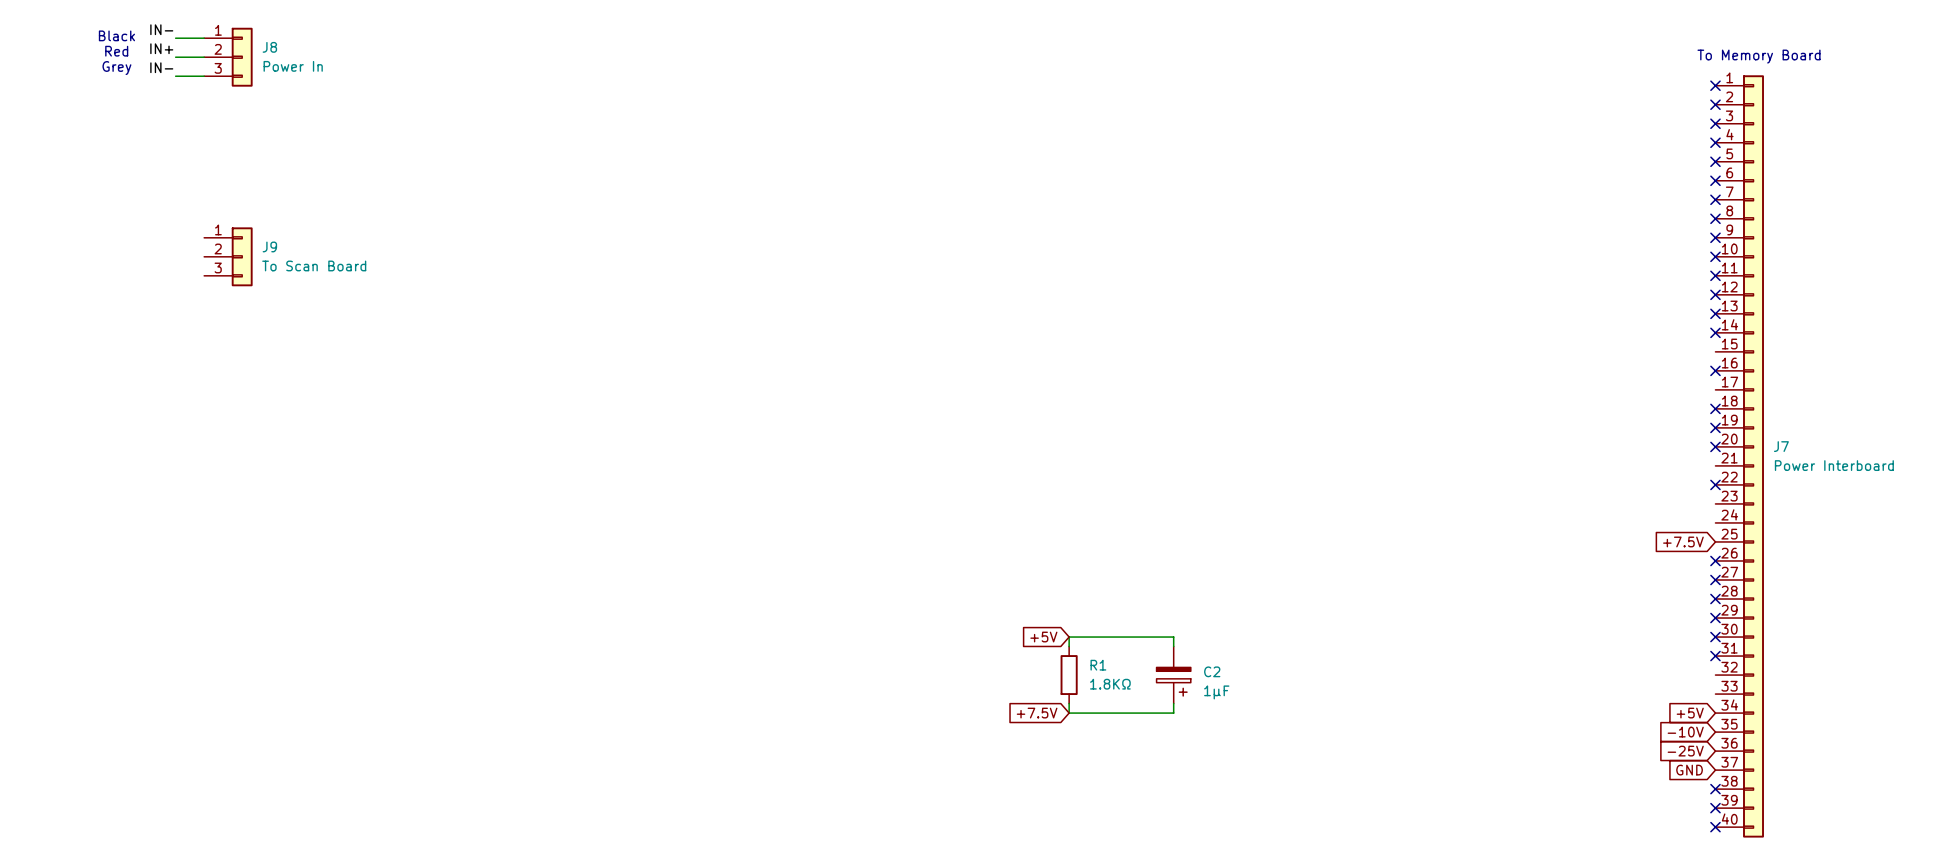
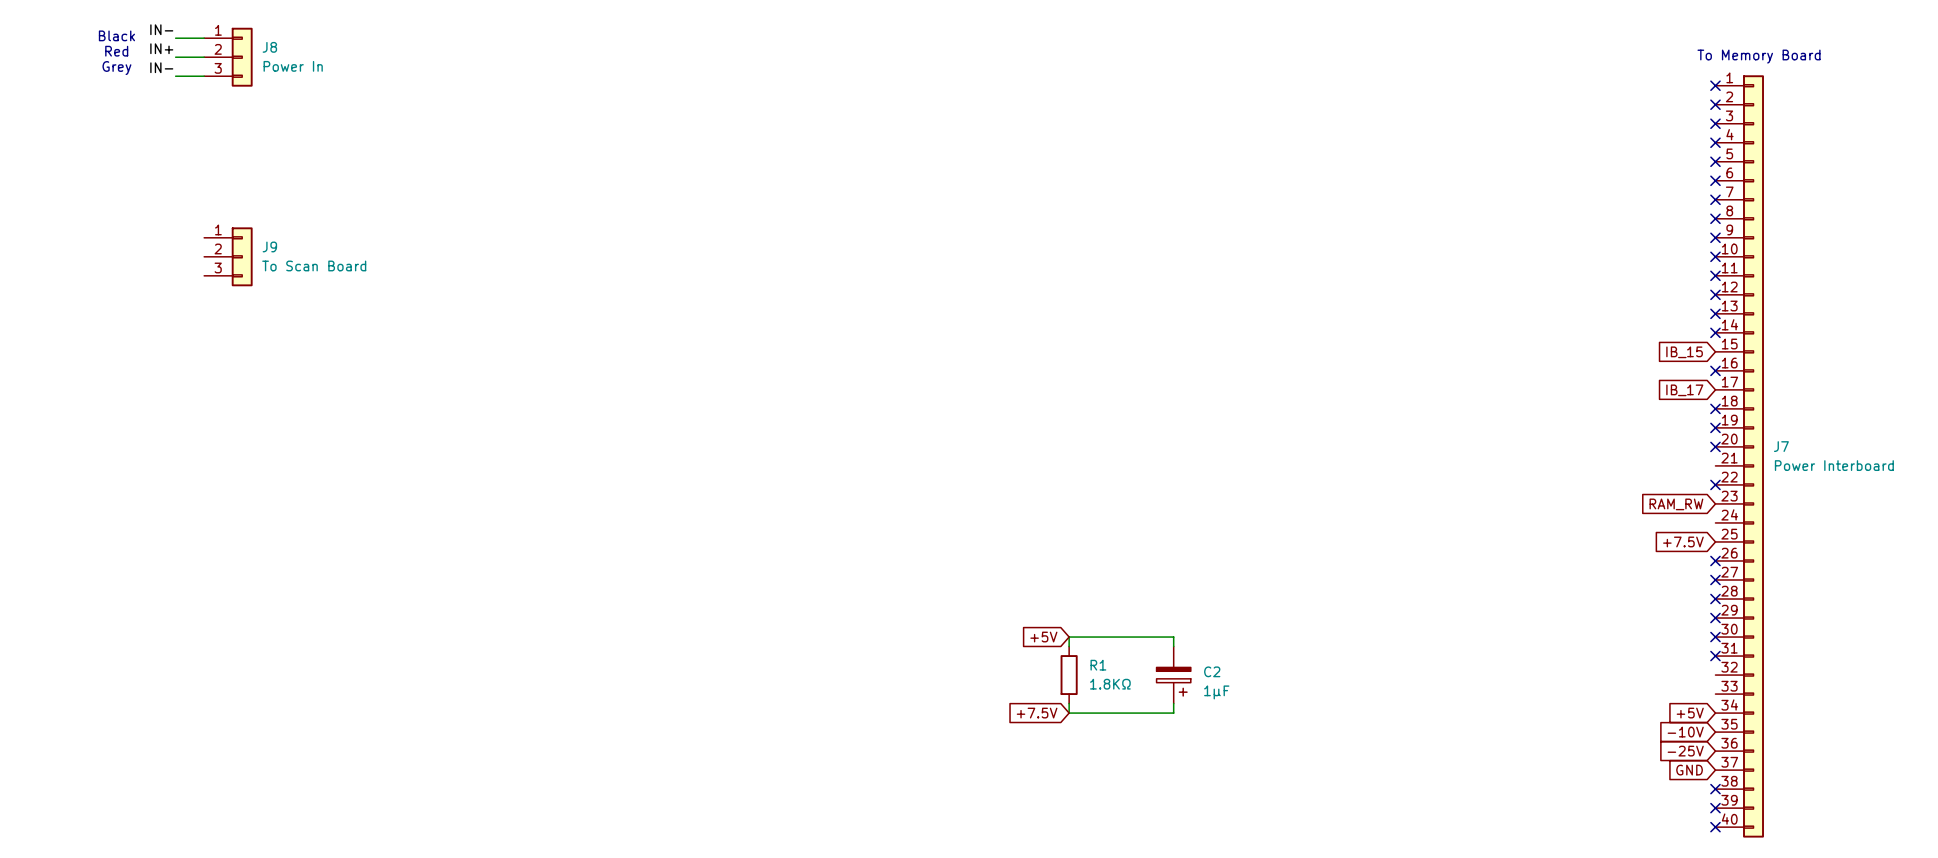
global label: none -> IB_15 (1684, 352)
global label: none -> IB_17 (1684, 390)
global label: none -> RAM_RW (1676, 504)

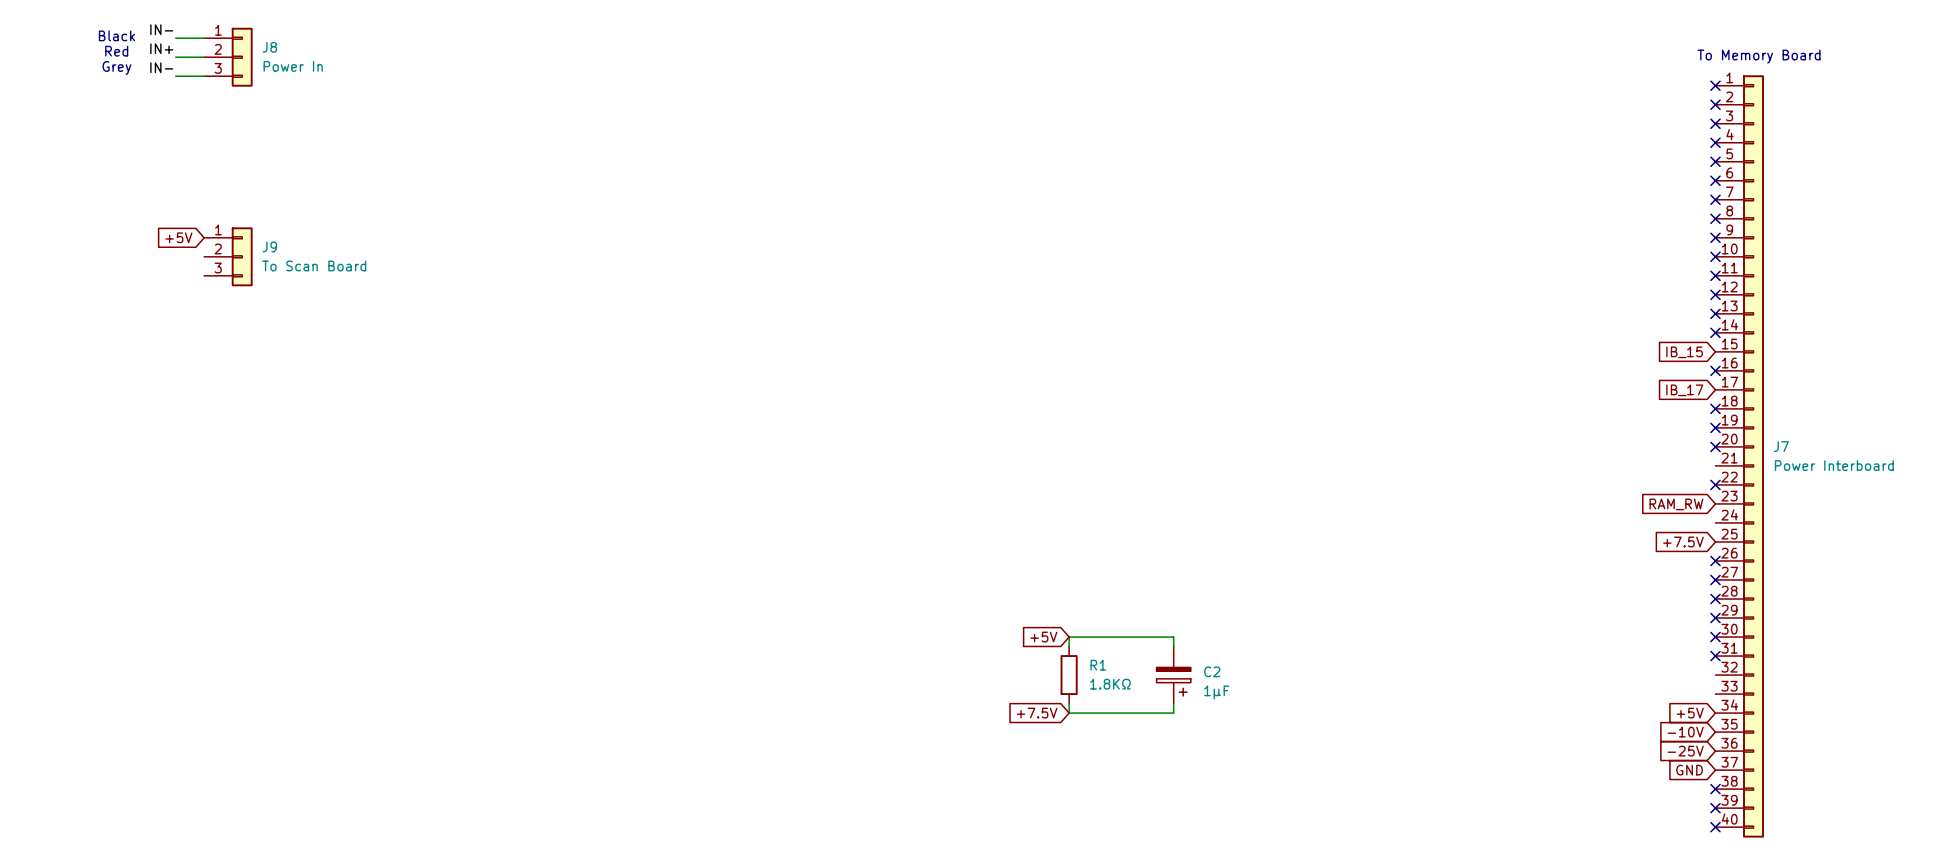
global label: none -> +5V (178, 237)

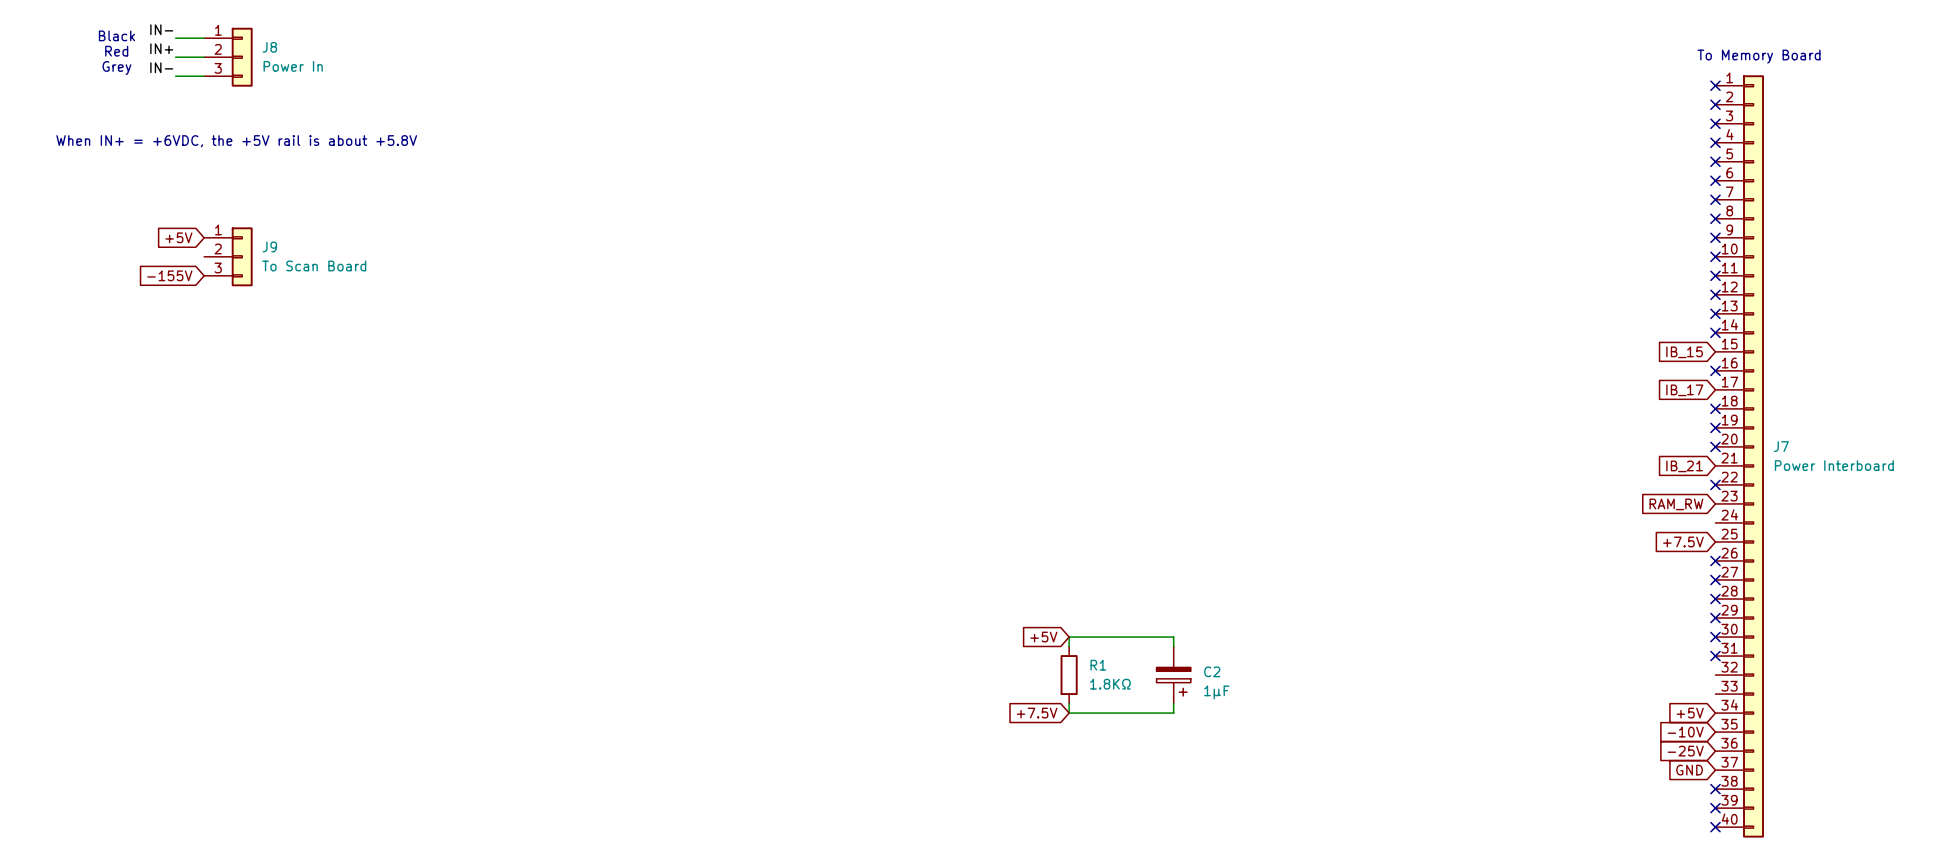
text: none -> When IN+ = +6VDC, the +5V rail is about +5.8V (236, 141)
global label: none -> -155V (169, 275)
global label: none -> IB_21 (1684, 466)

